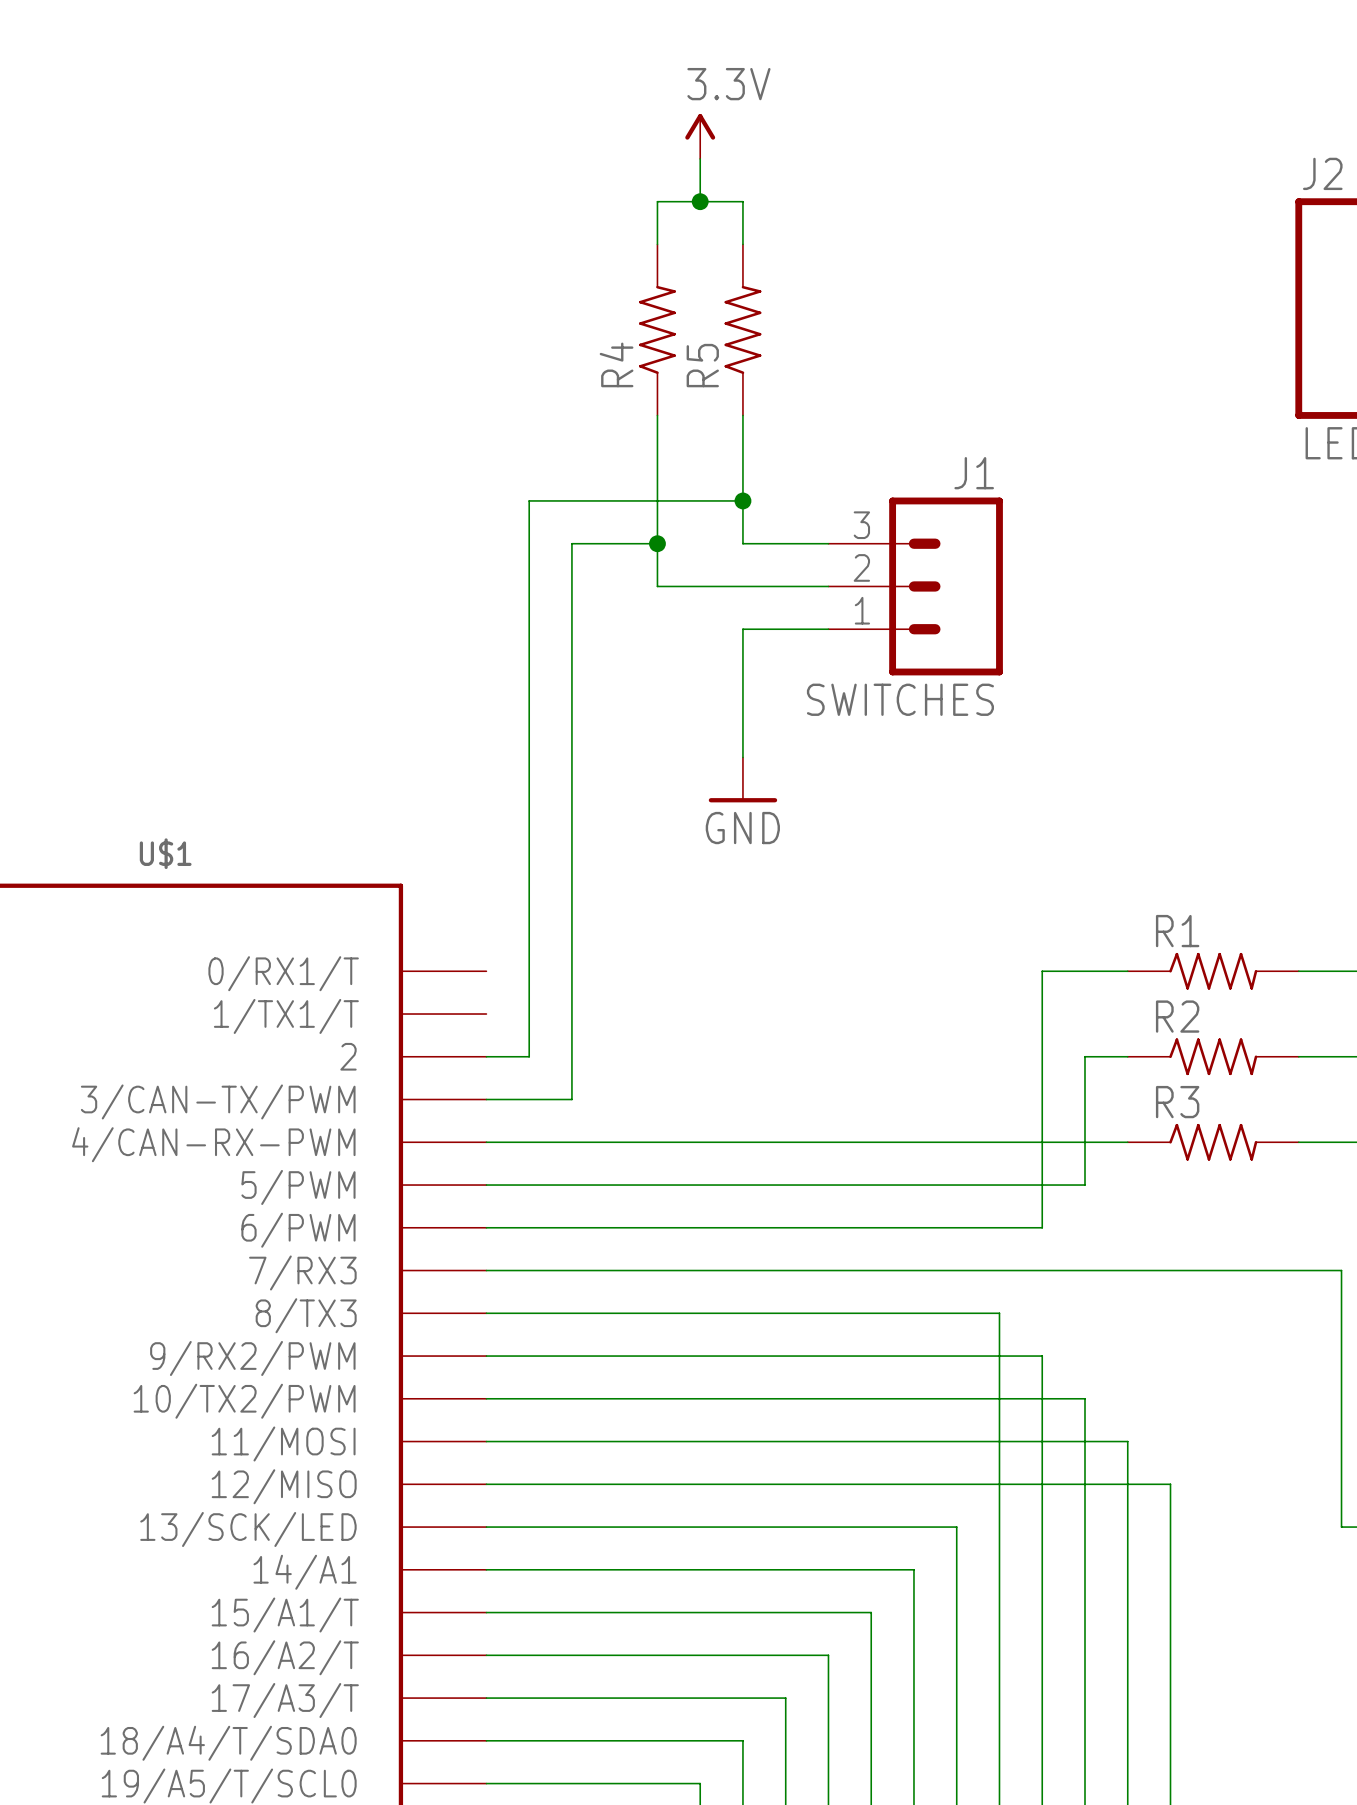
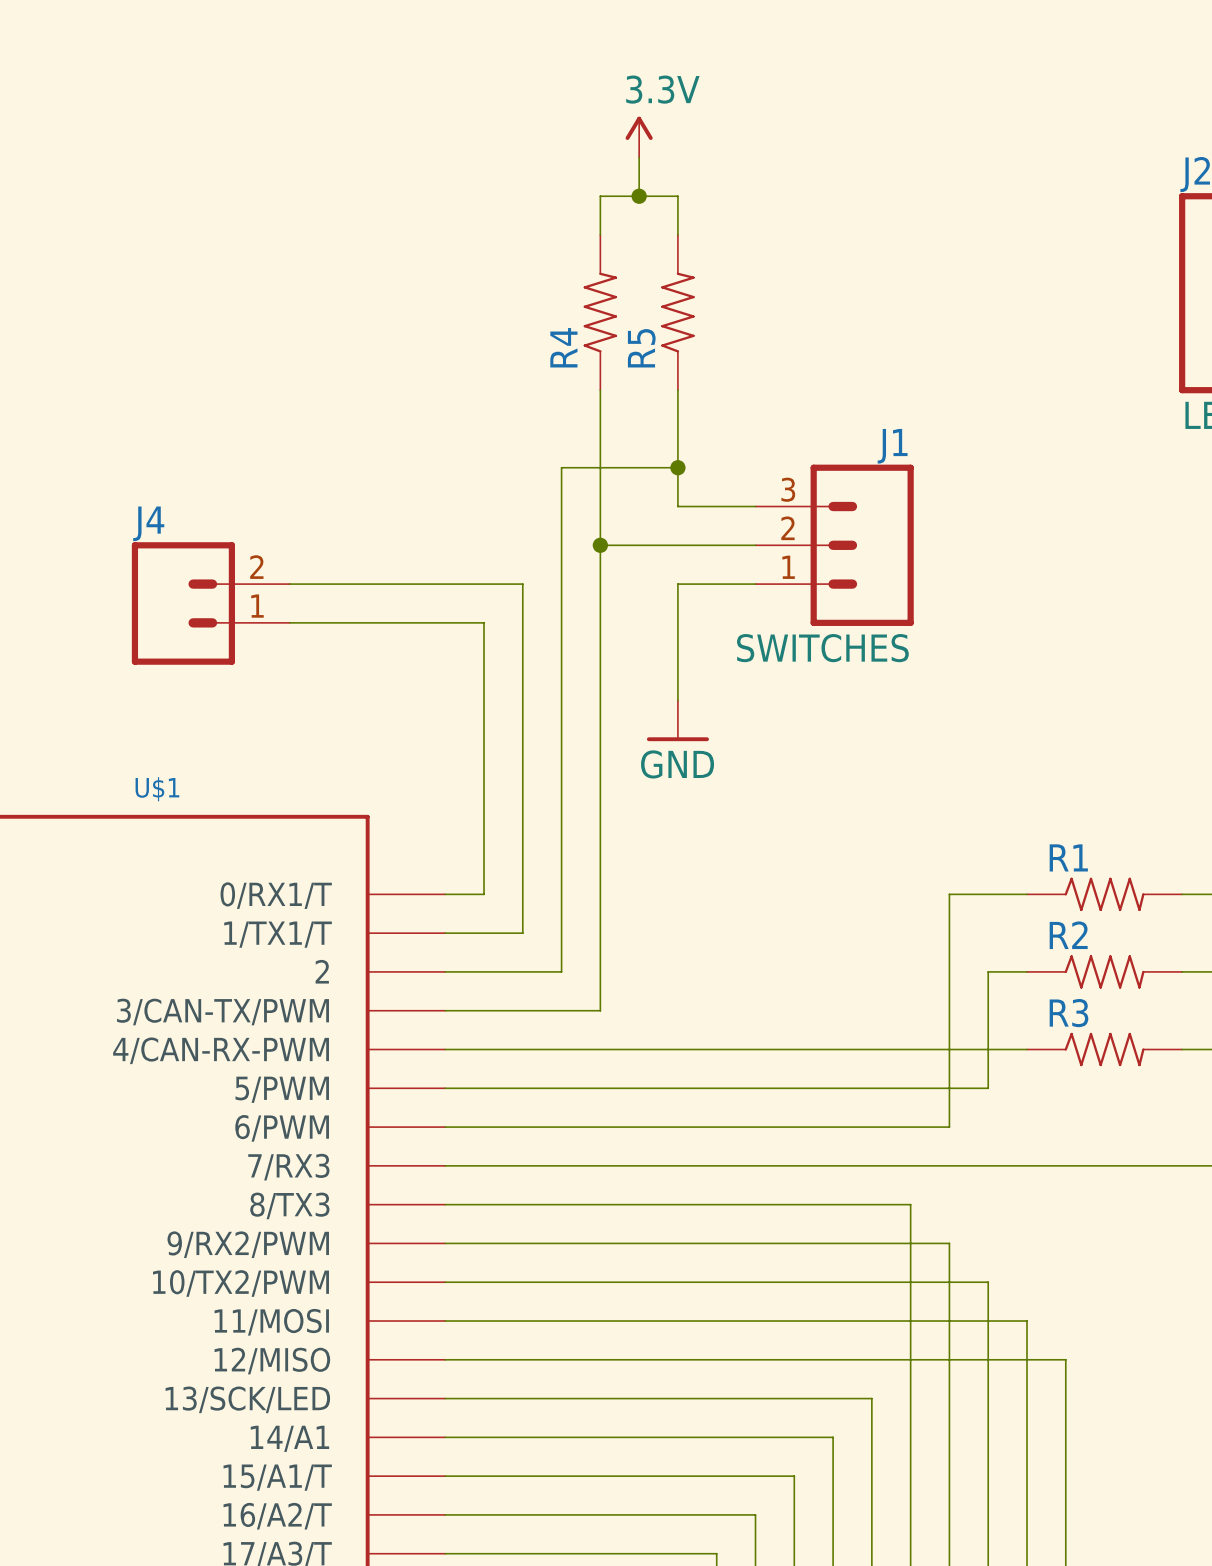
wire: (614, 500) (529, 500) (529, 671) -> (290, 622) (484, 622)
wire: none -> (561, 467) (561, 971) (484, 971)
wire: (657, 543) (571, 543) (571, 629) -> (290, 584) (522, 584)
junction position: (657, 543) -> (600, 545)
wire: none -> (600, 545) (600, 1010) (522, 1010)
J4: none -> (210, 603)
wire: (529, 971) (529, 1056) -> (484, 894) (445, 894)
wire: (571, 1014) (571, 1099) -> (522, 933) (445, 933)

